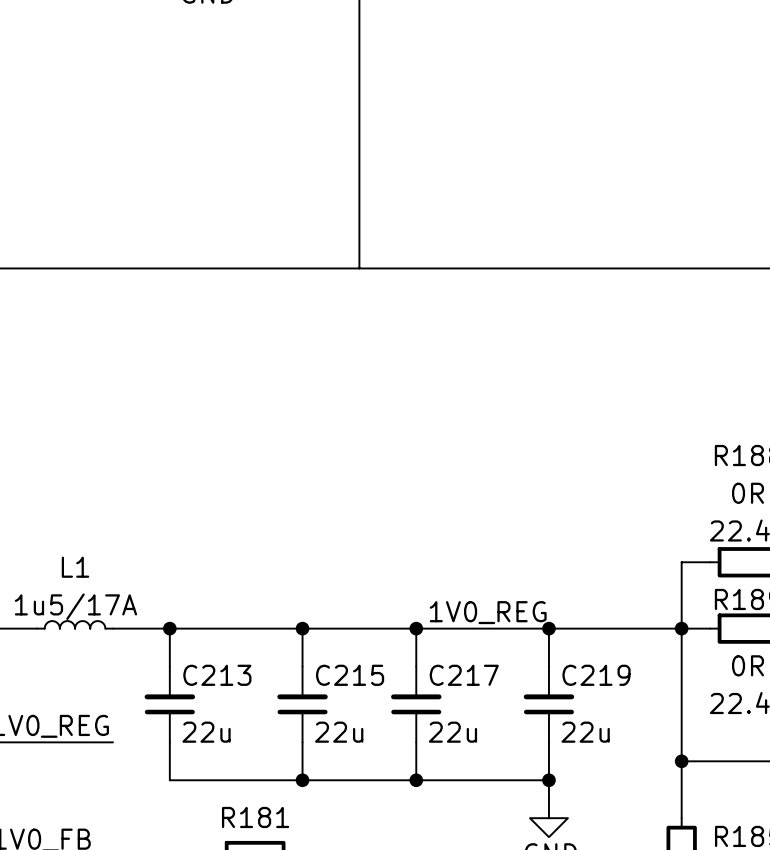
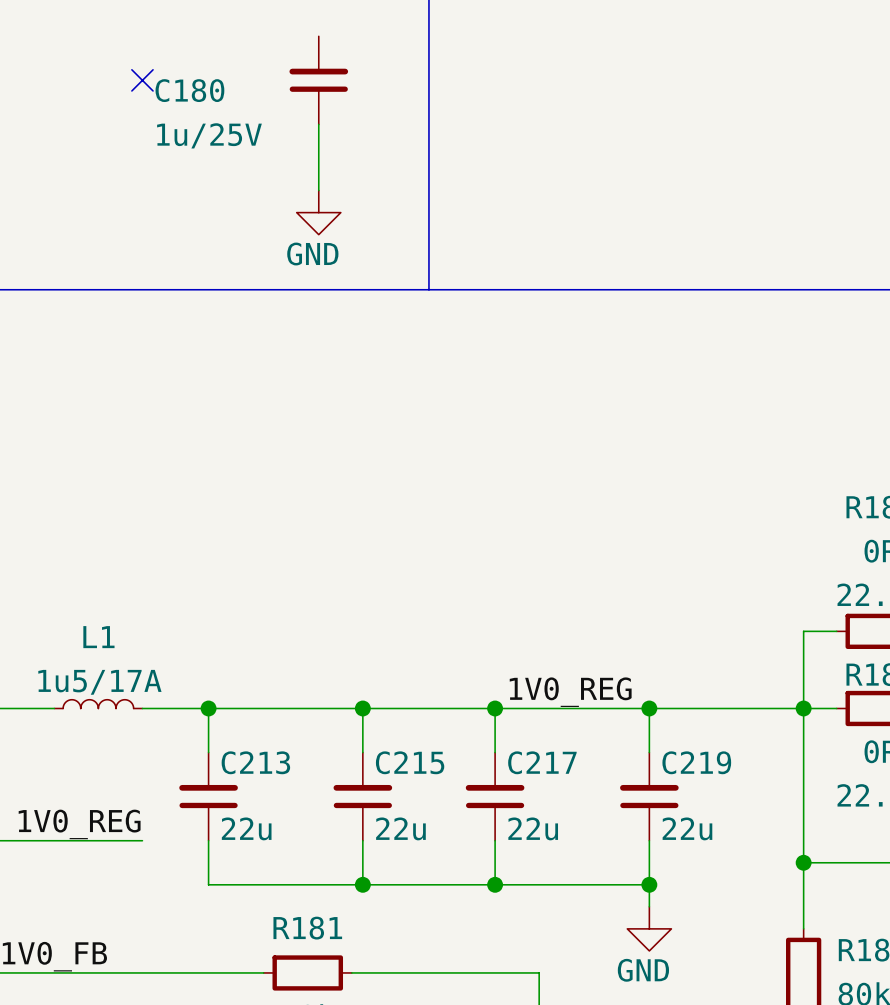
no-connect mark: none -> (142, 80)
C180: none -> (318, 80)
wire: none -> (318, 124) (318, 190)
power symbol: none -> GND (318, 212)

